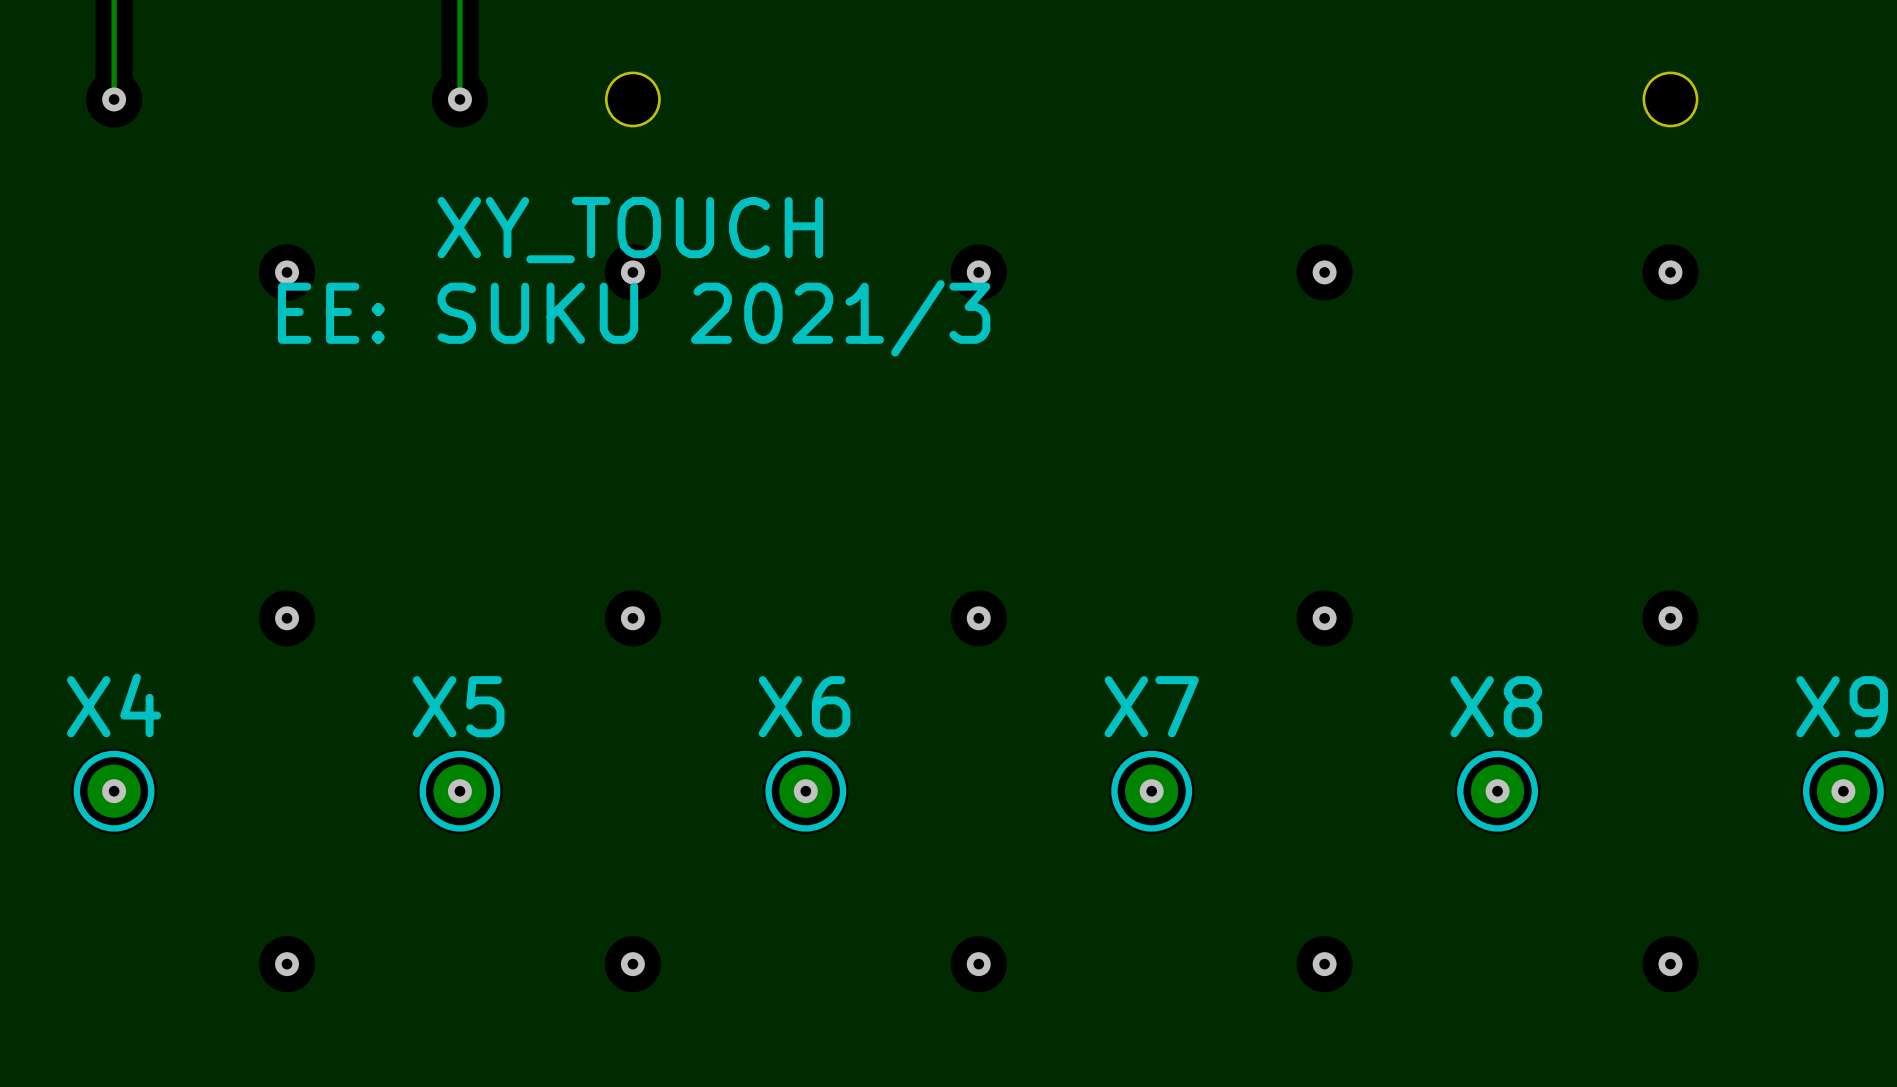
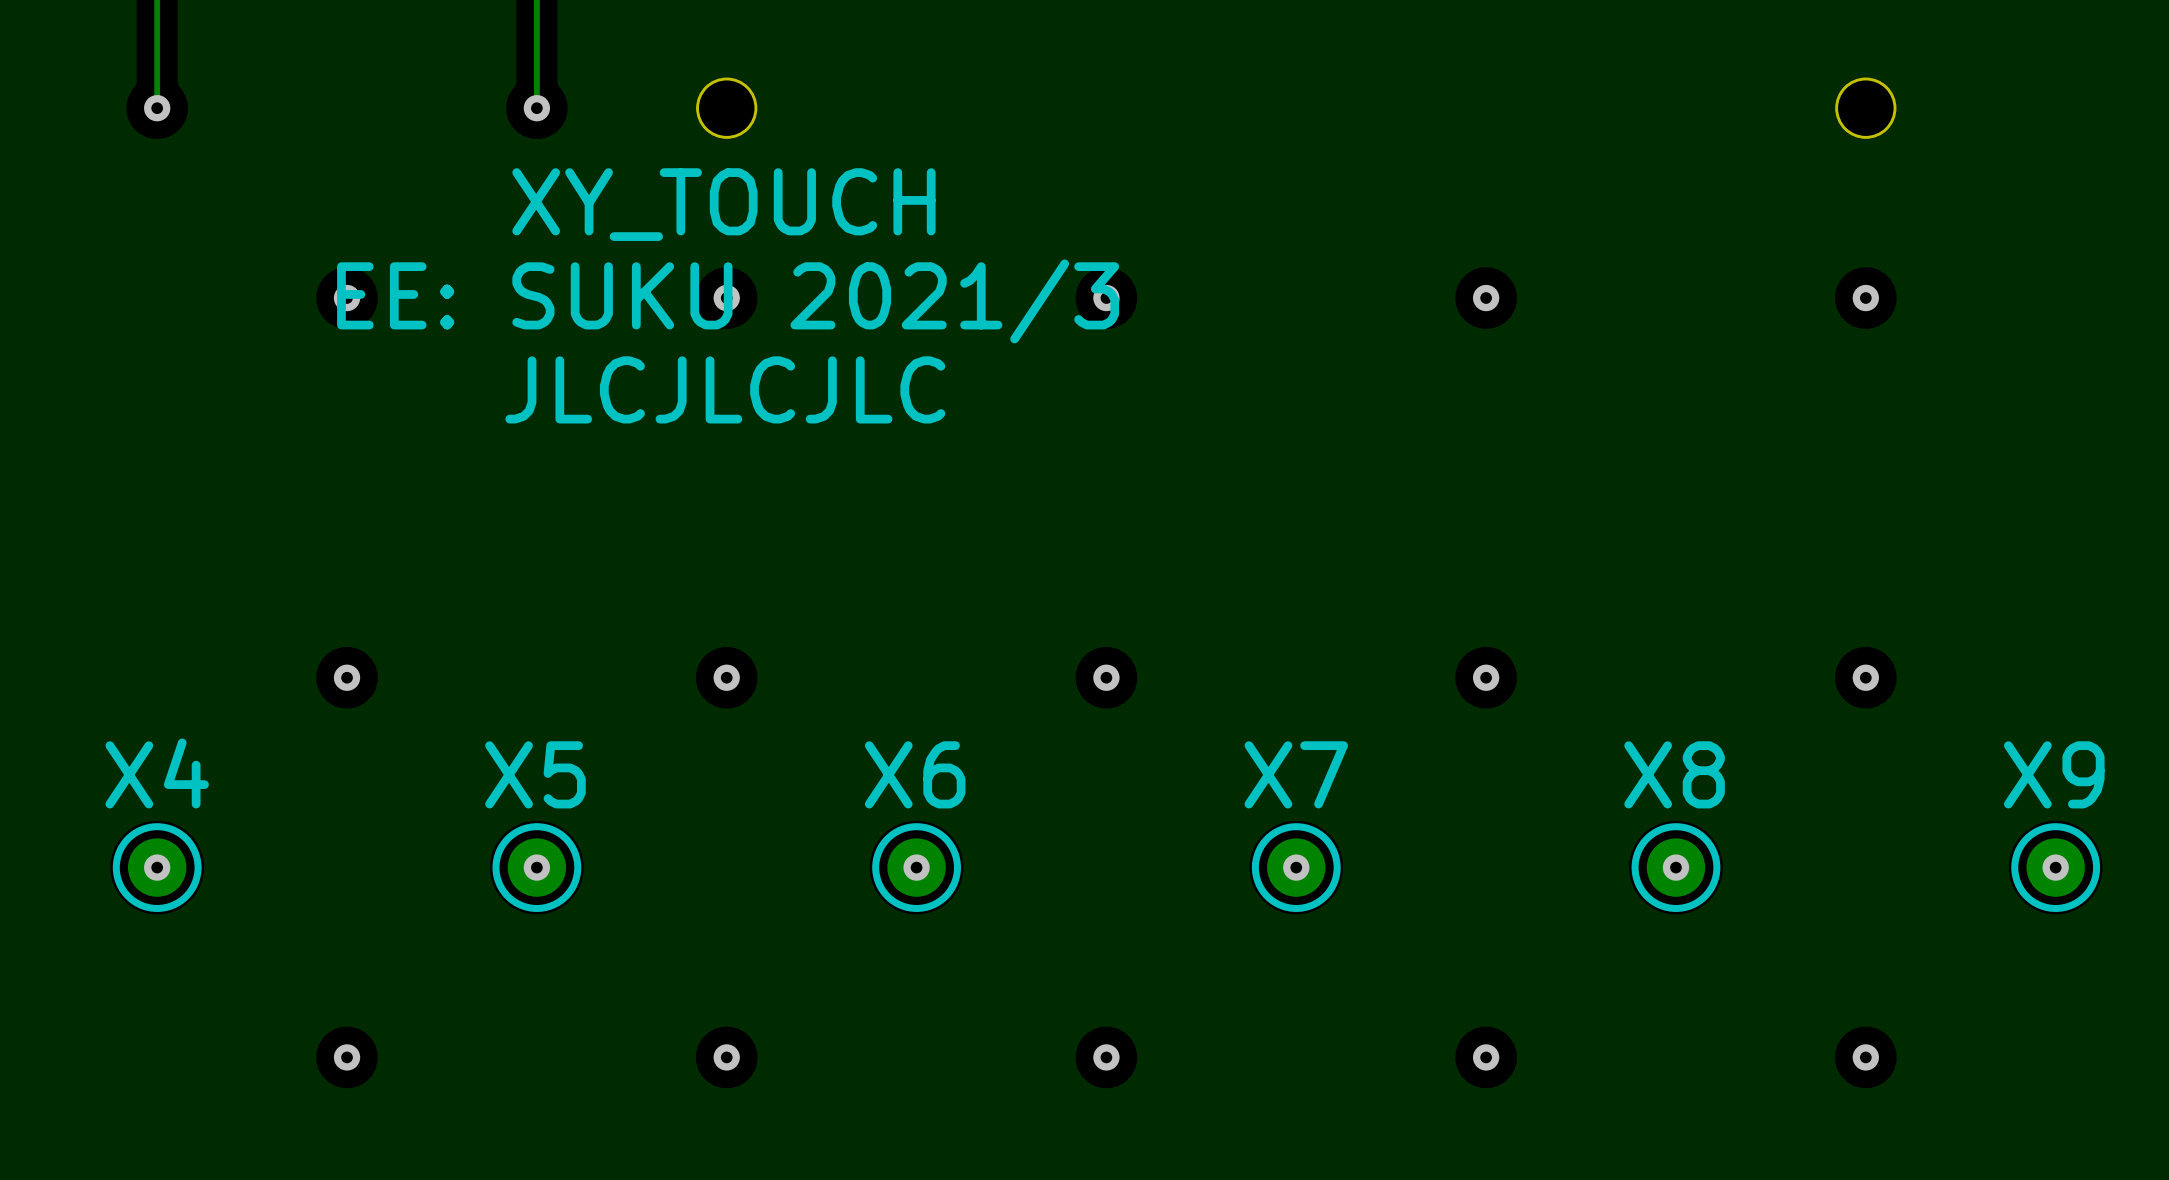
text position: XY_TOUCH (630, 230) -> XY_TOUCH (723, 204)
text position: EE: SUKU 2021/3 (634, 318) -> EE: SUKU 2021/3 (728, 301)
text: none -> JLCJLCJLC (725, 389)

